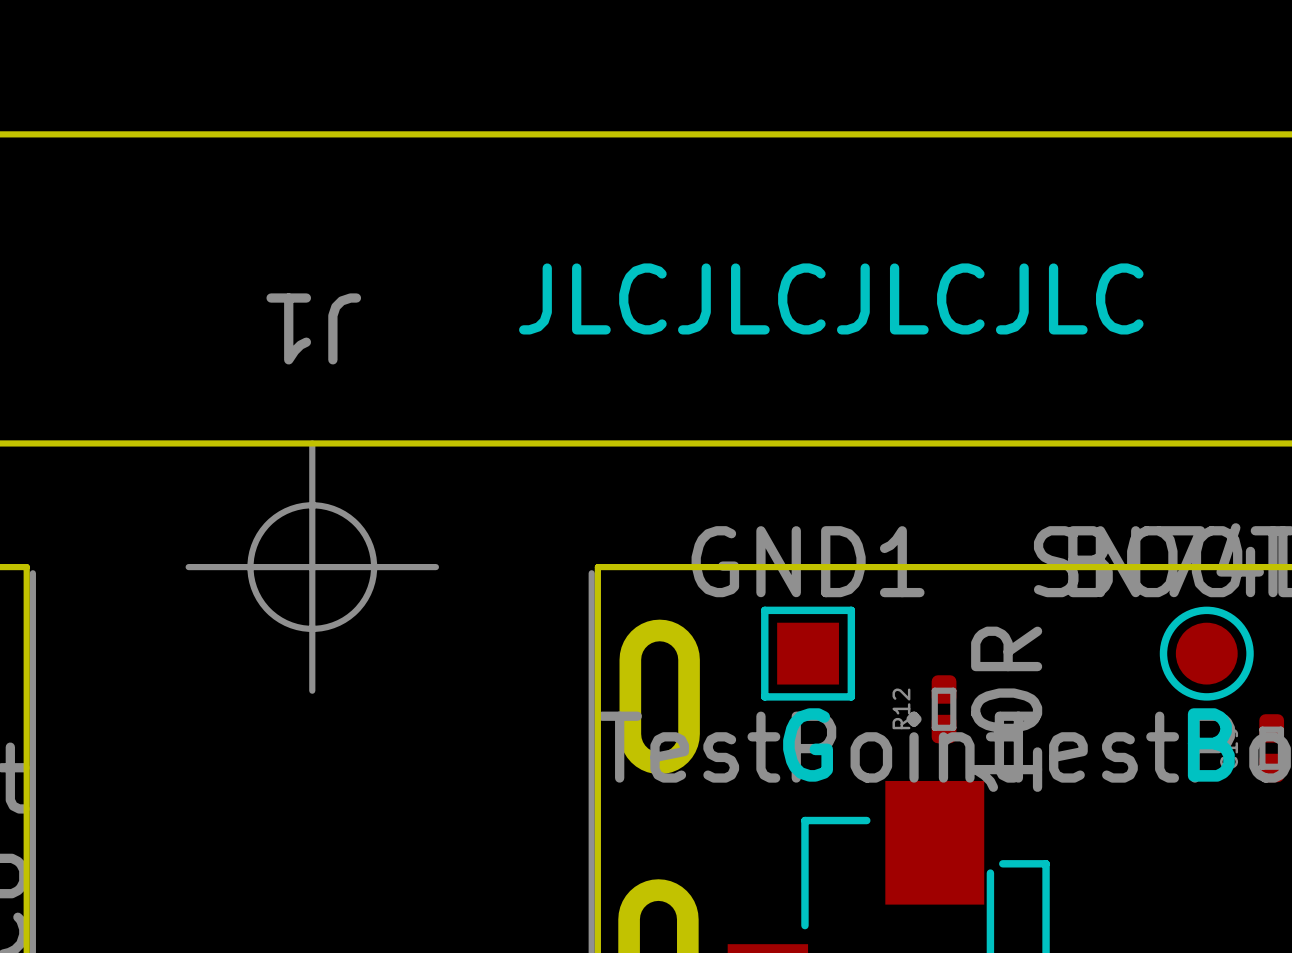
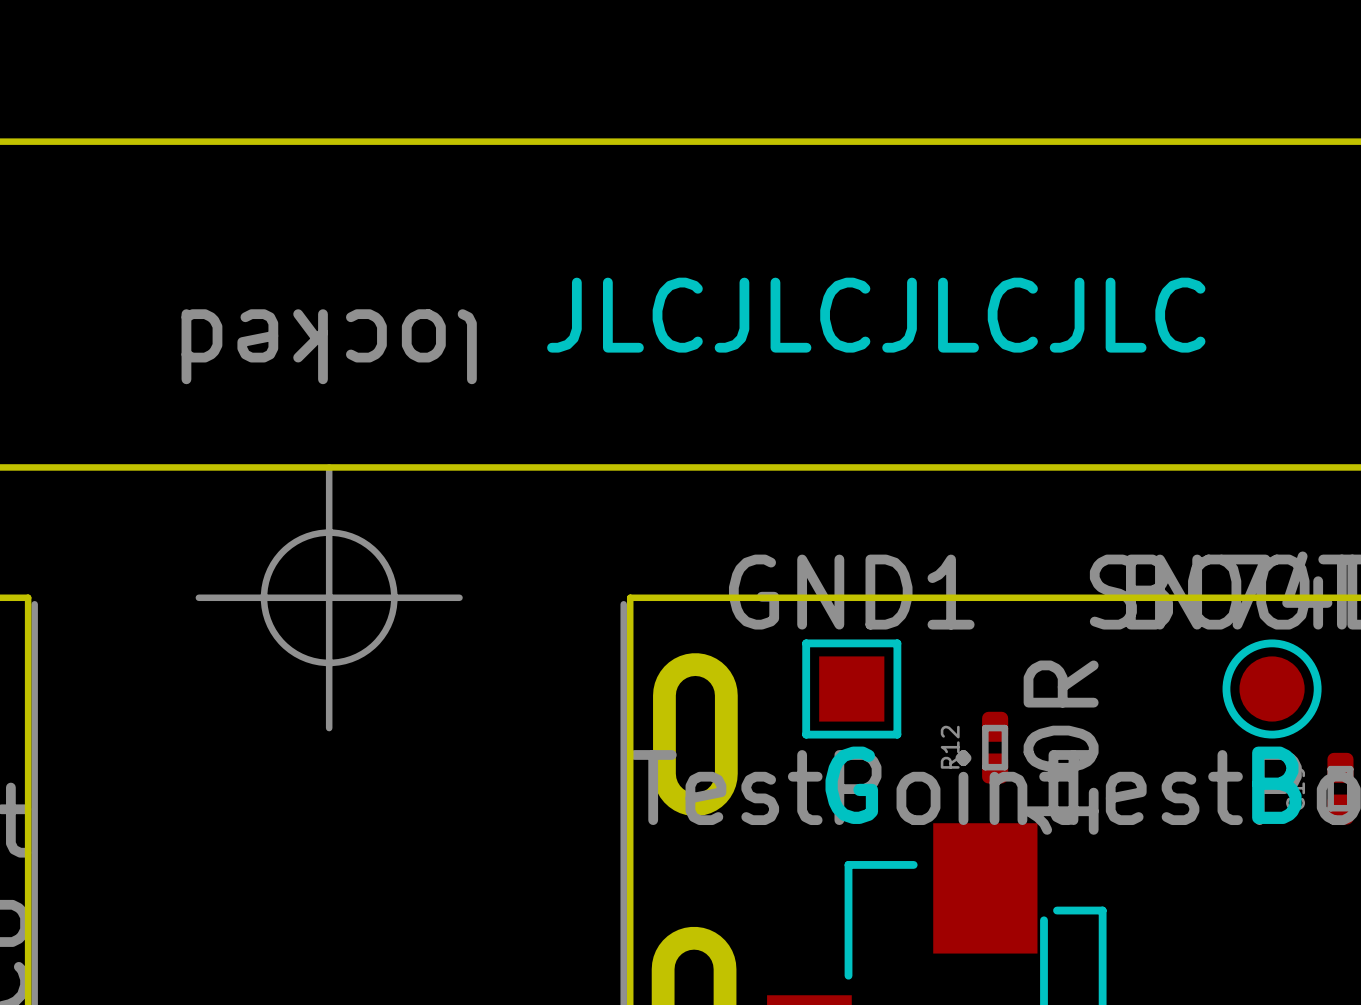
J1 name: J1 (313, 328) -> locked (329, 346)

